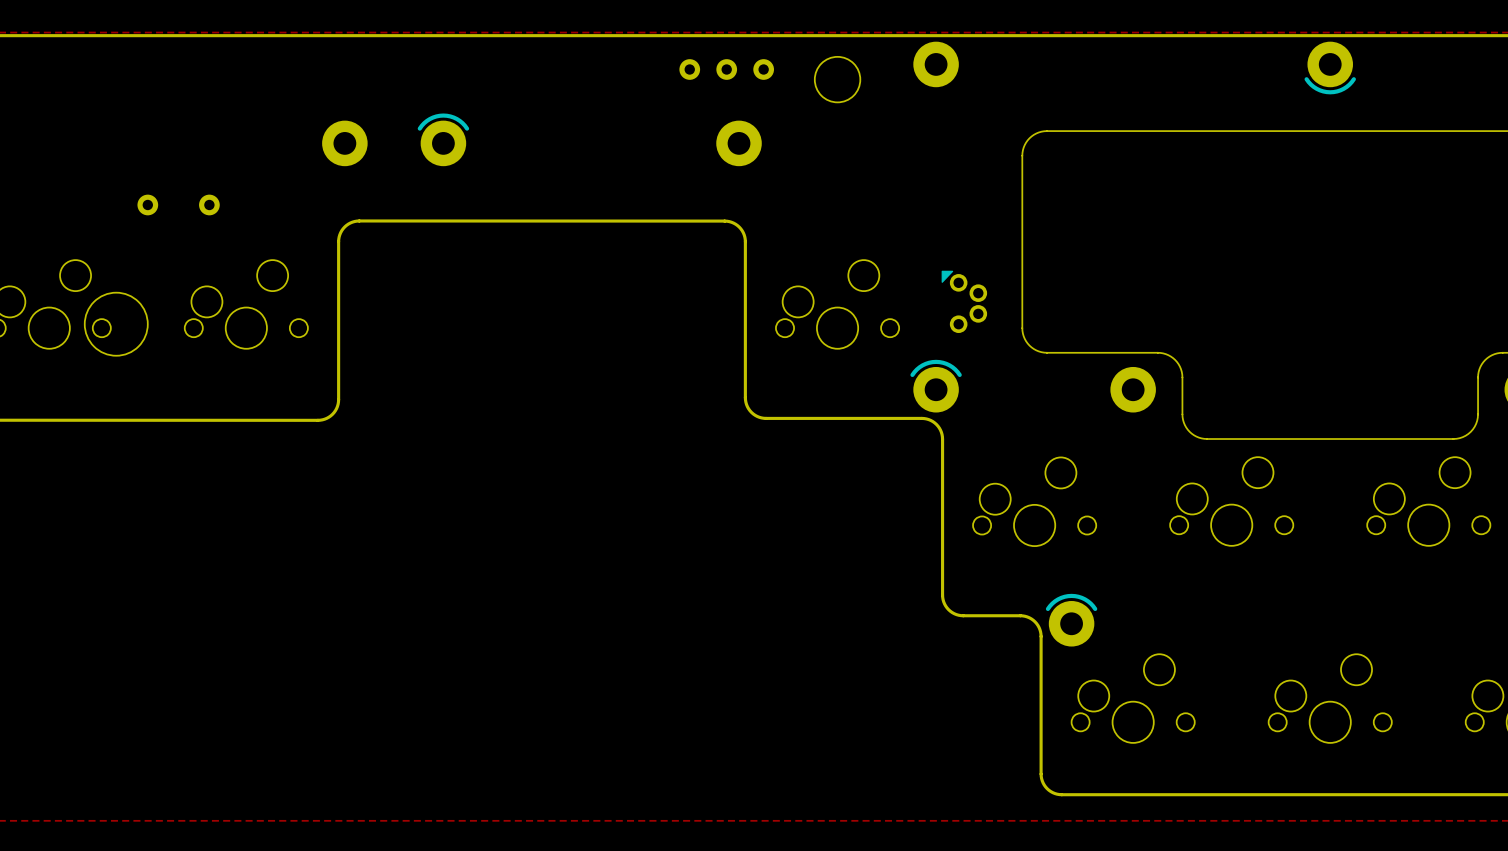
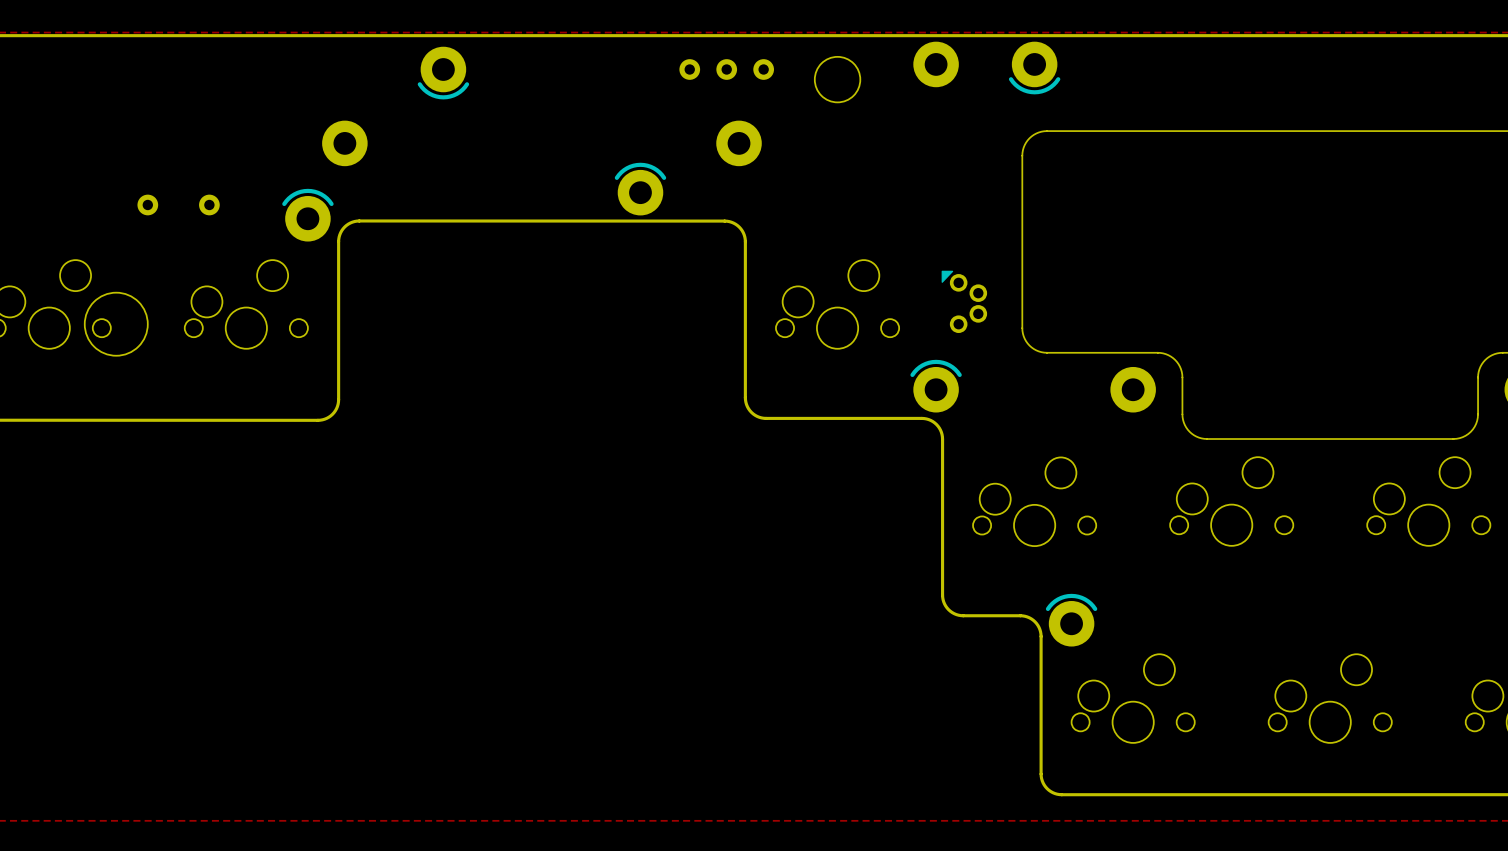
part: none -> (1034, 68)
part: (1330, 68) -> none
part rotation: 0° (443, 139) -> 180° (443, 73)
part position: (443, 139) -> (443, 73)
part: none -> (640, 189)
part: none -> (307, 215)

